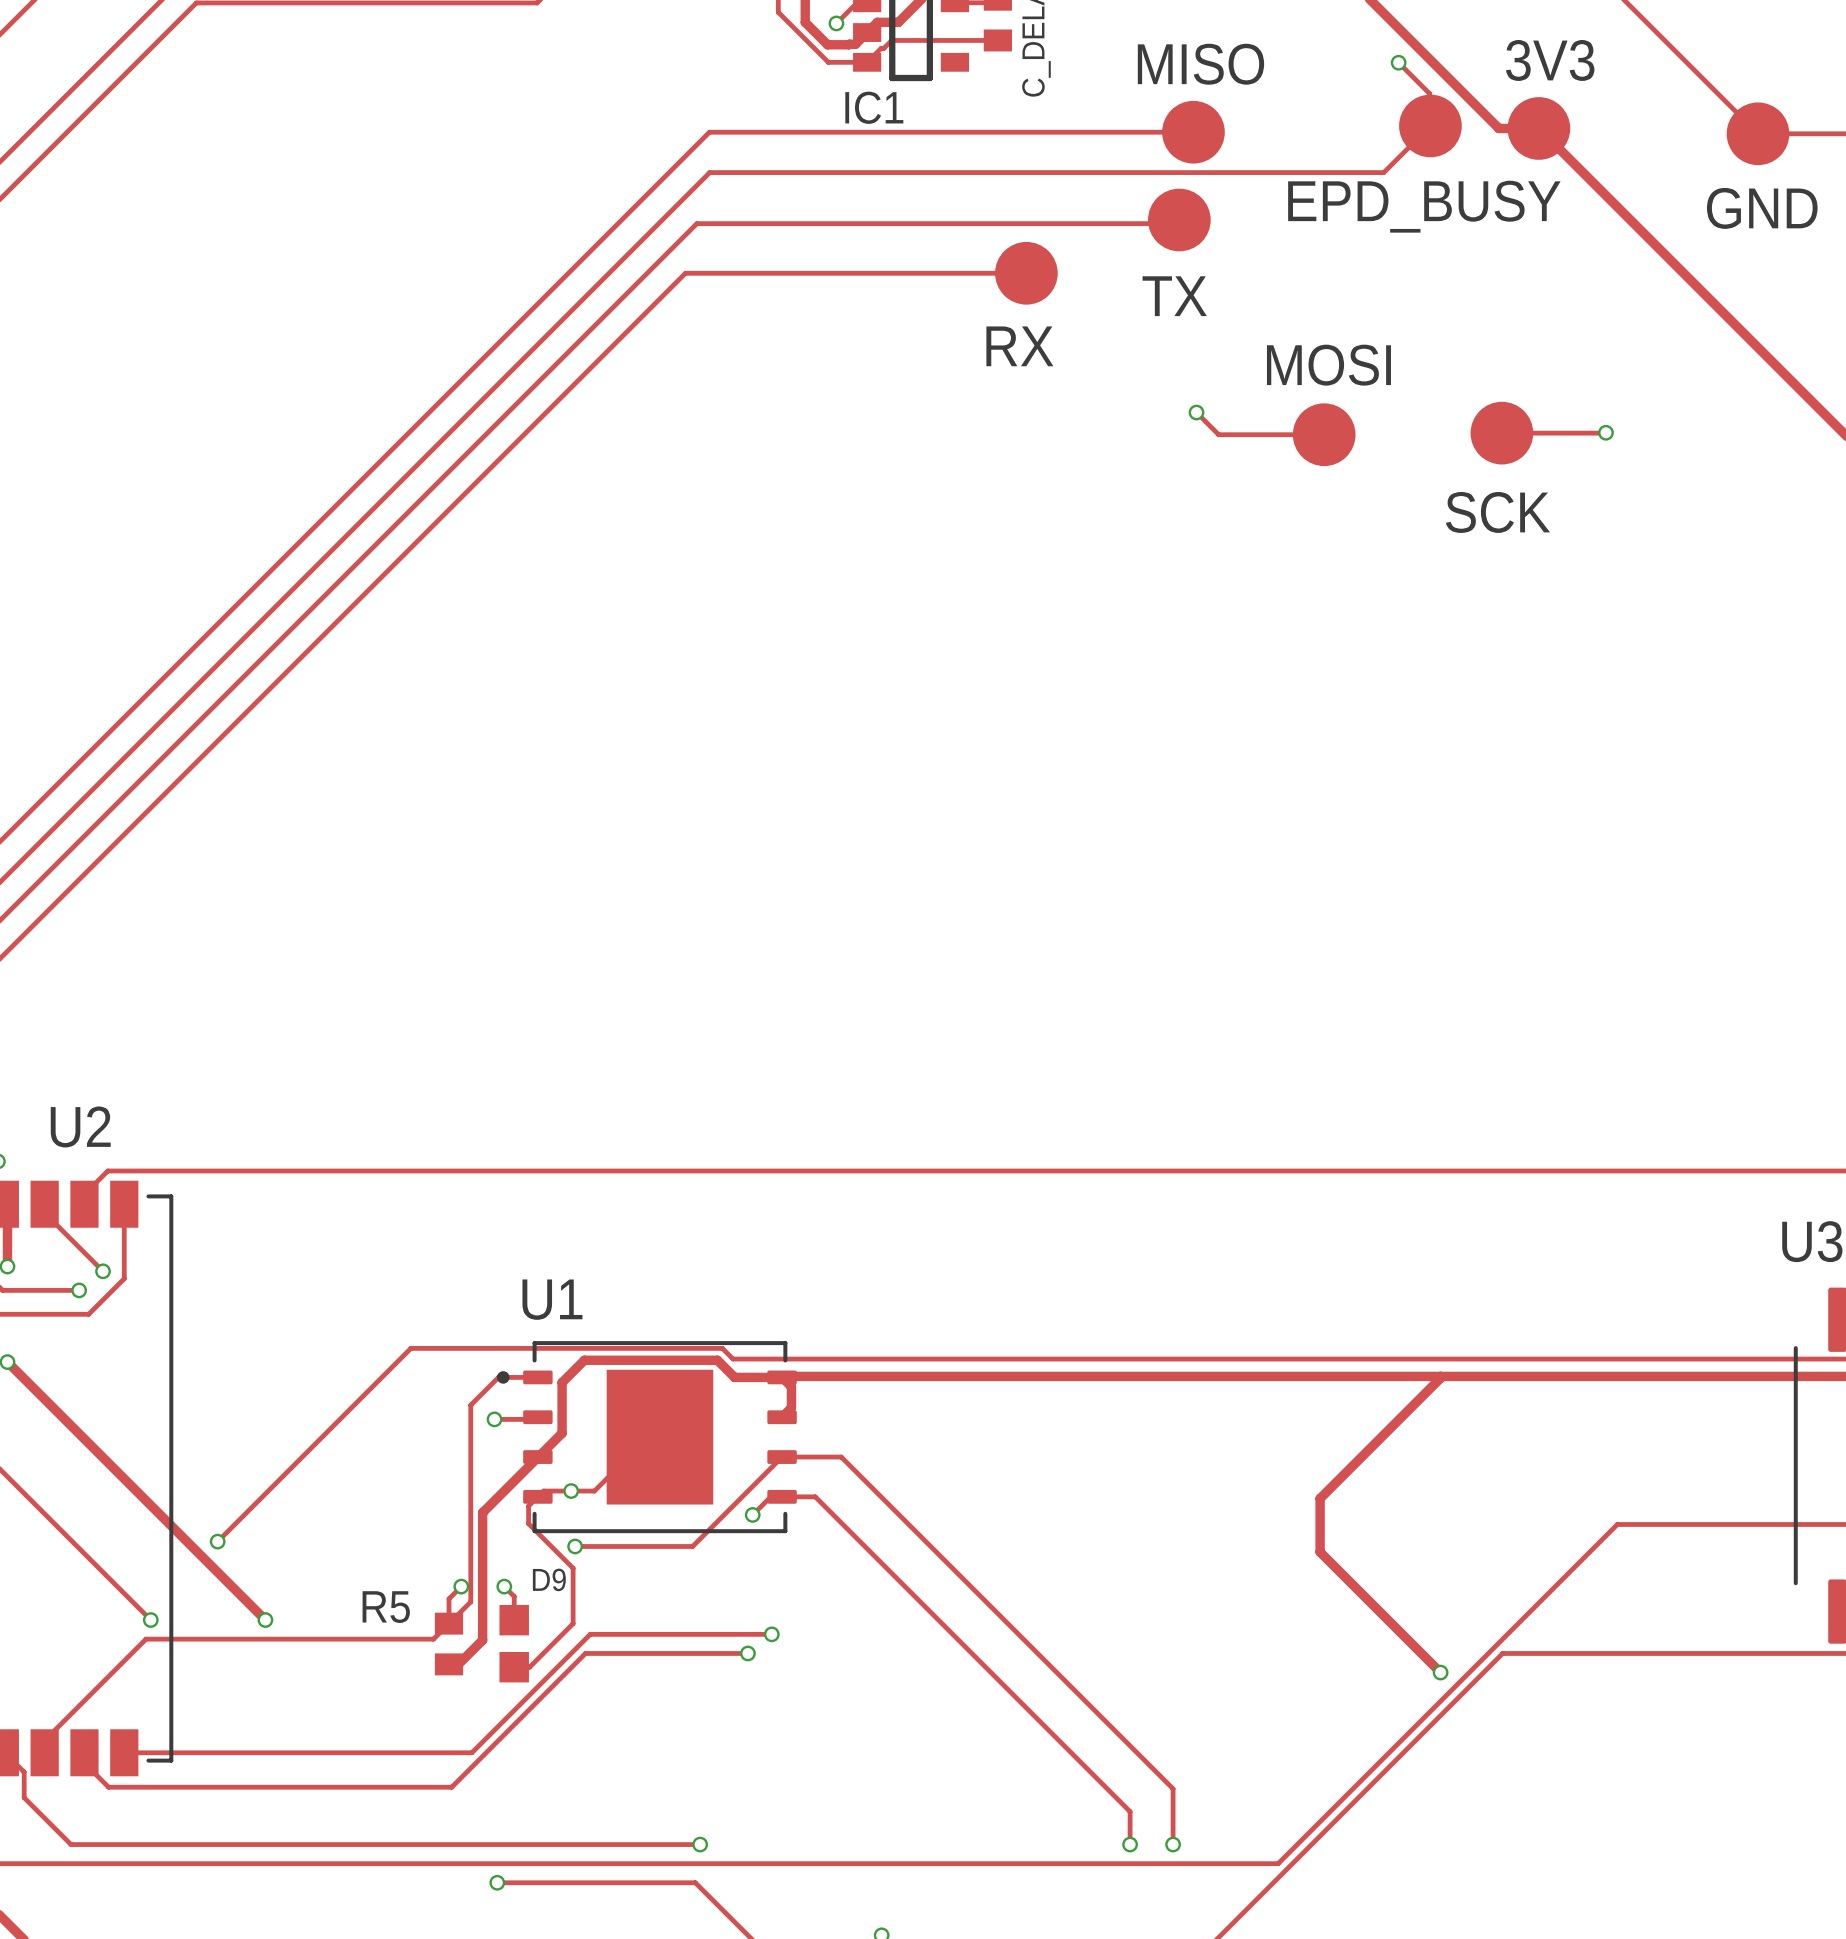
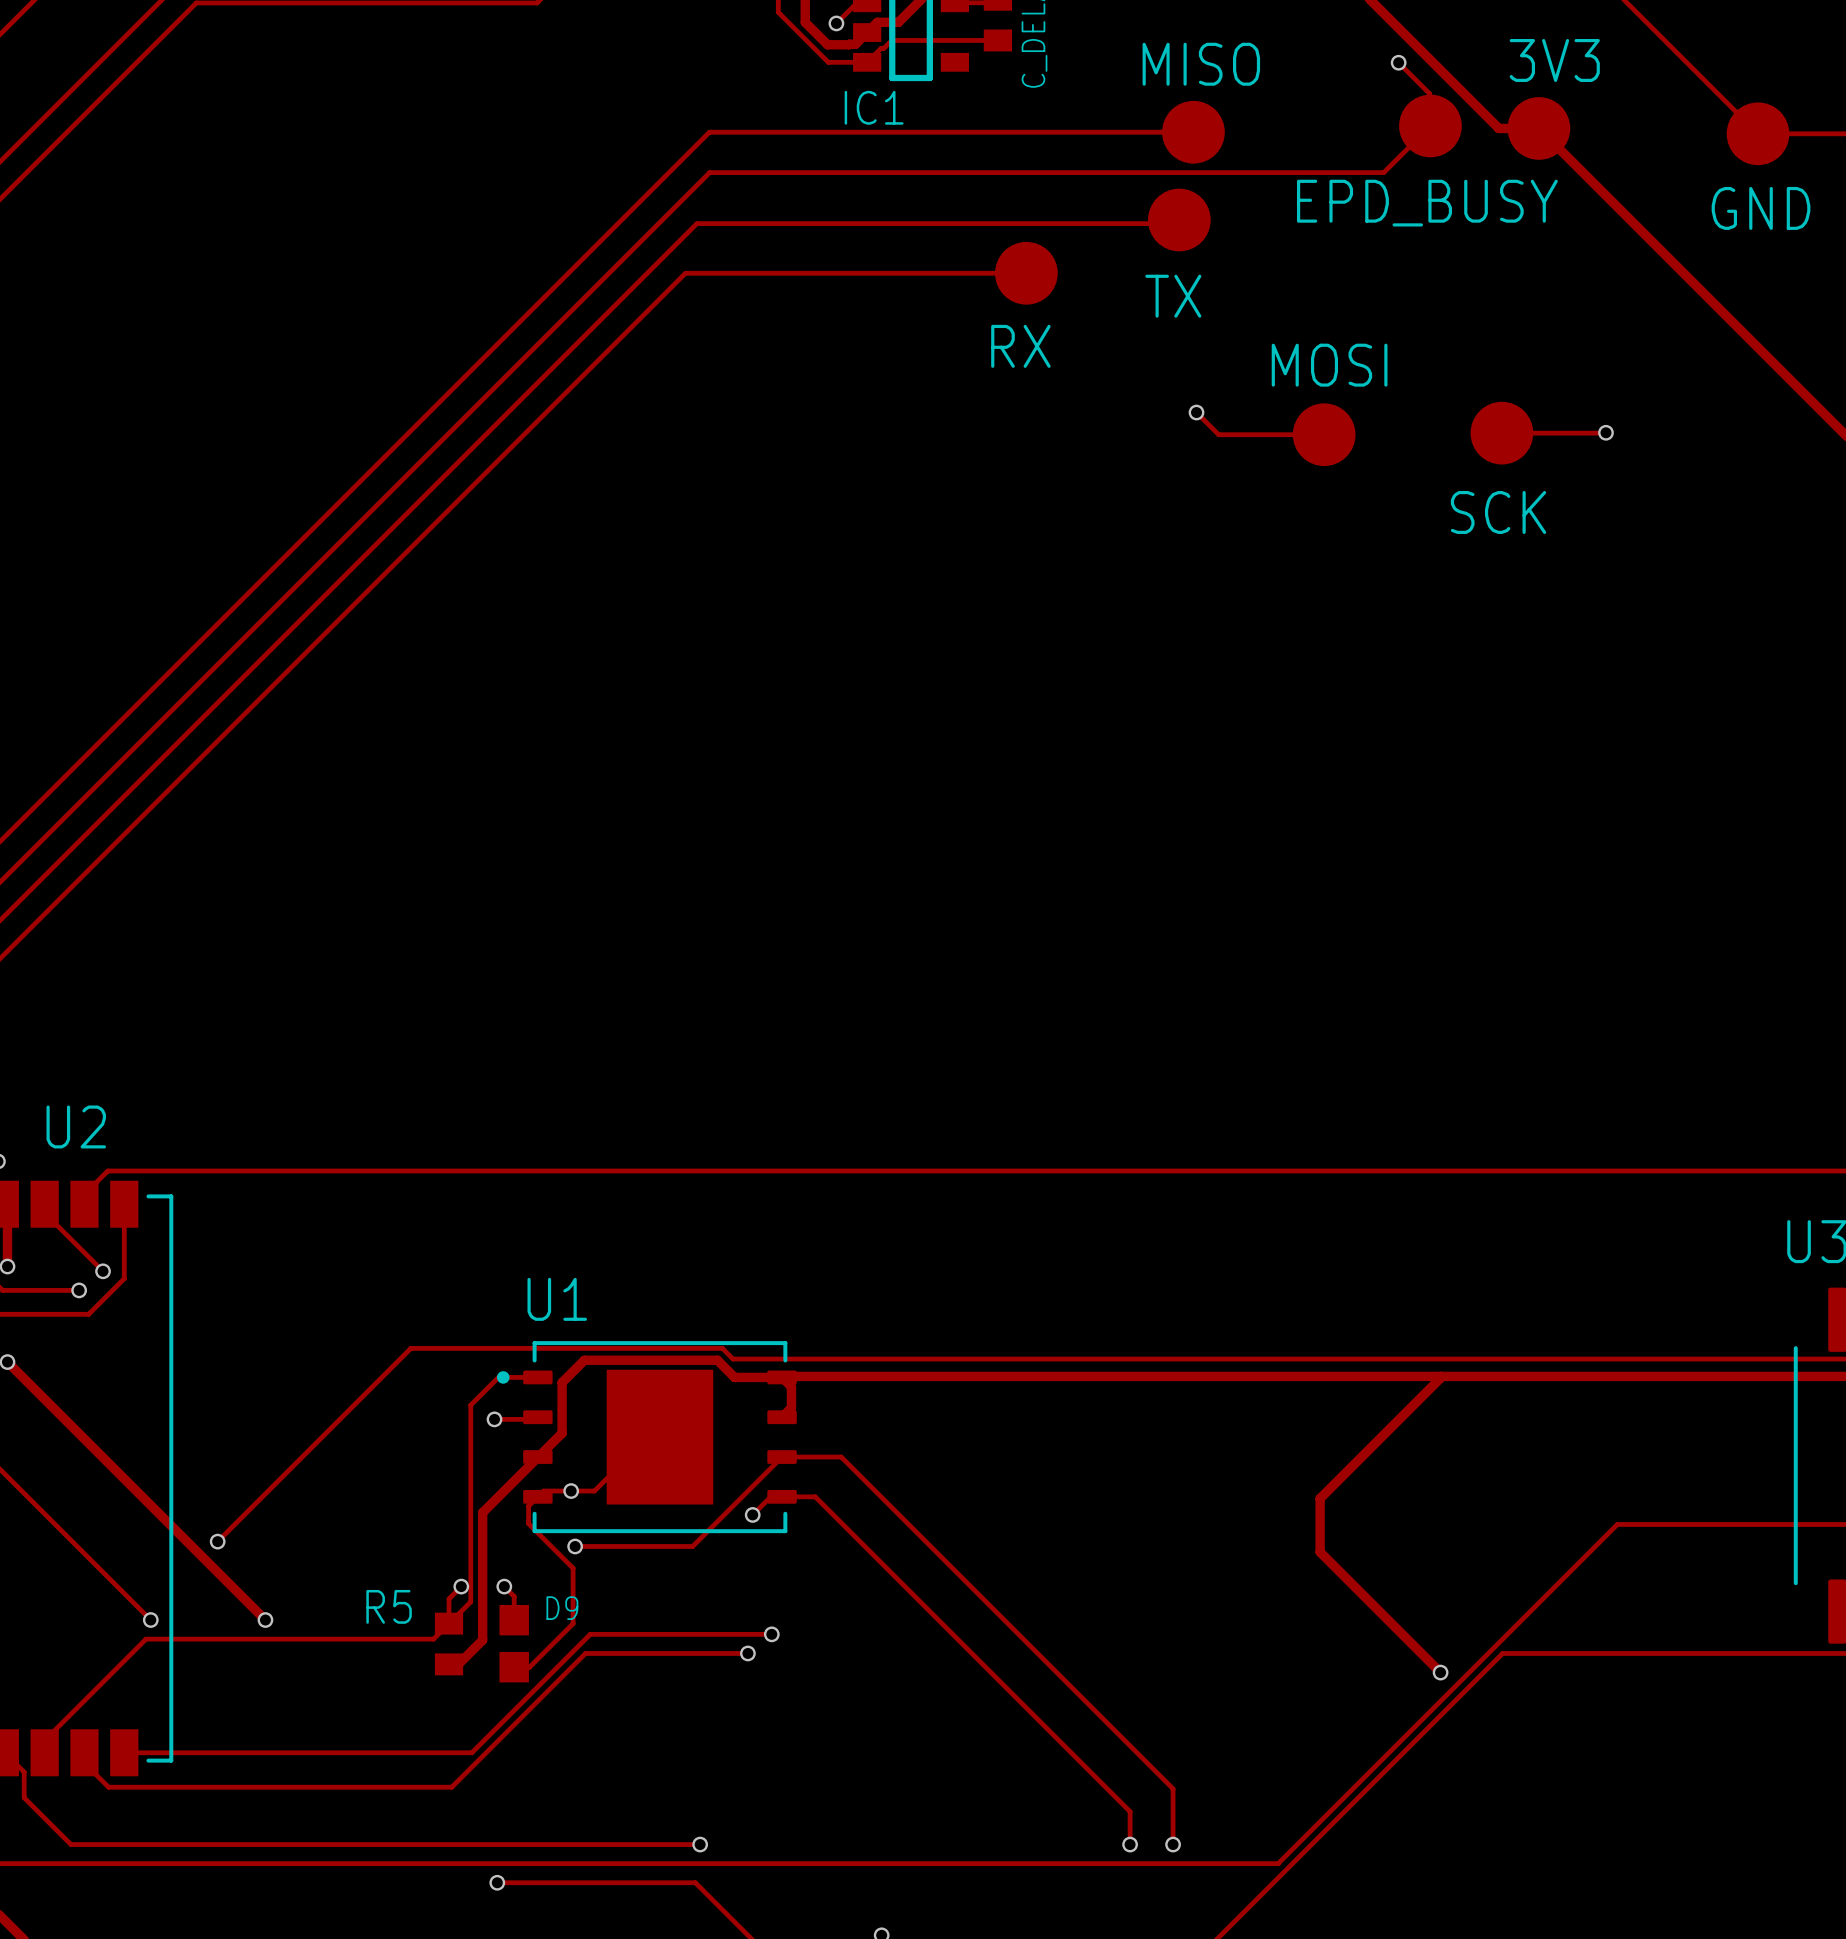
D9 name position: D9 (549, 1579) -> D9 (562, 1608)

